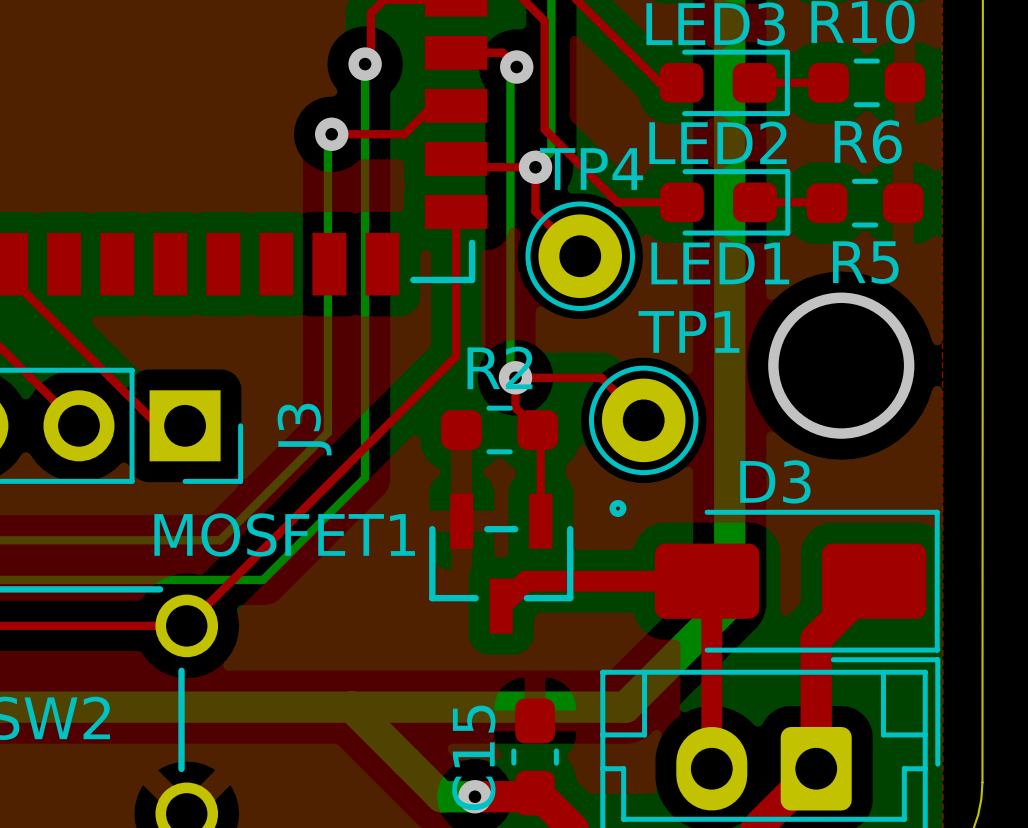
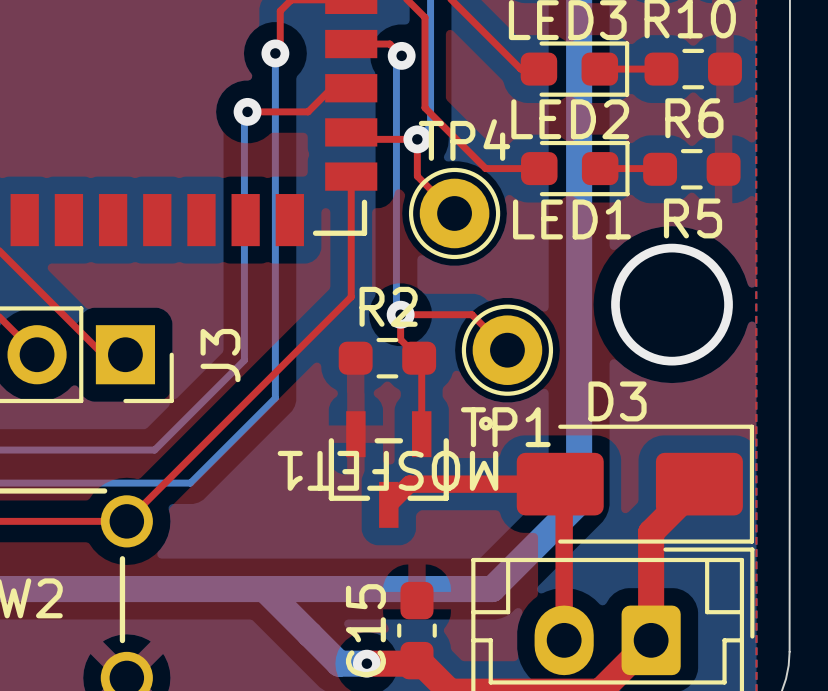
TP1 name position: TP1 (689, 331) -> TP1 (505, 427)
MOSFET1 name rotation: 0° (284, 534) -> 180° (387, 470)

